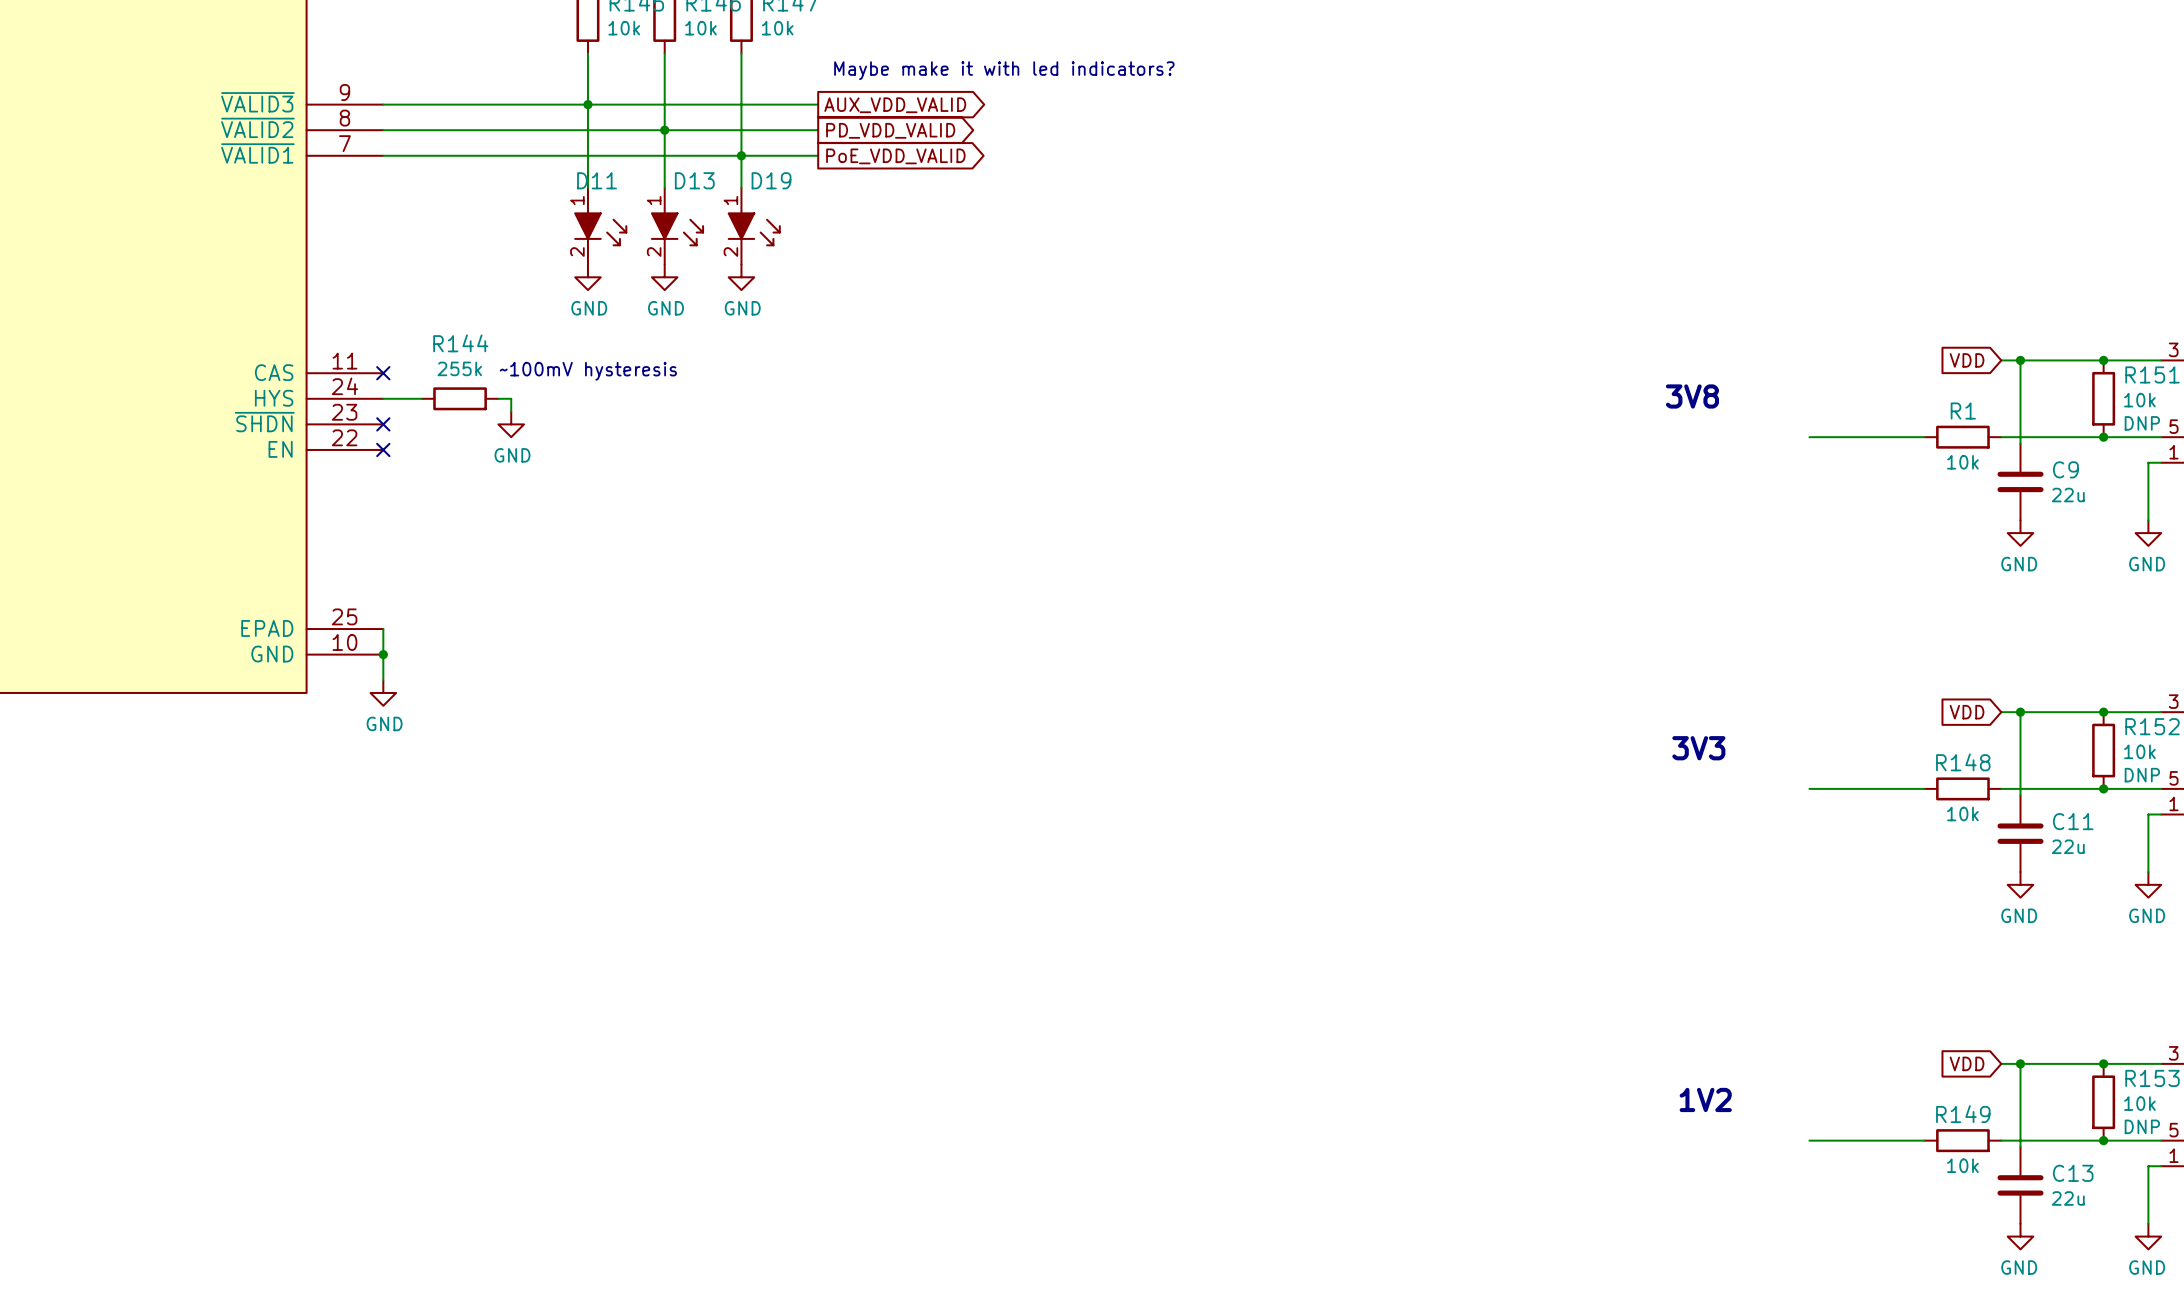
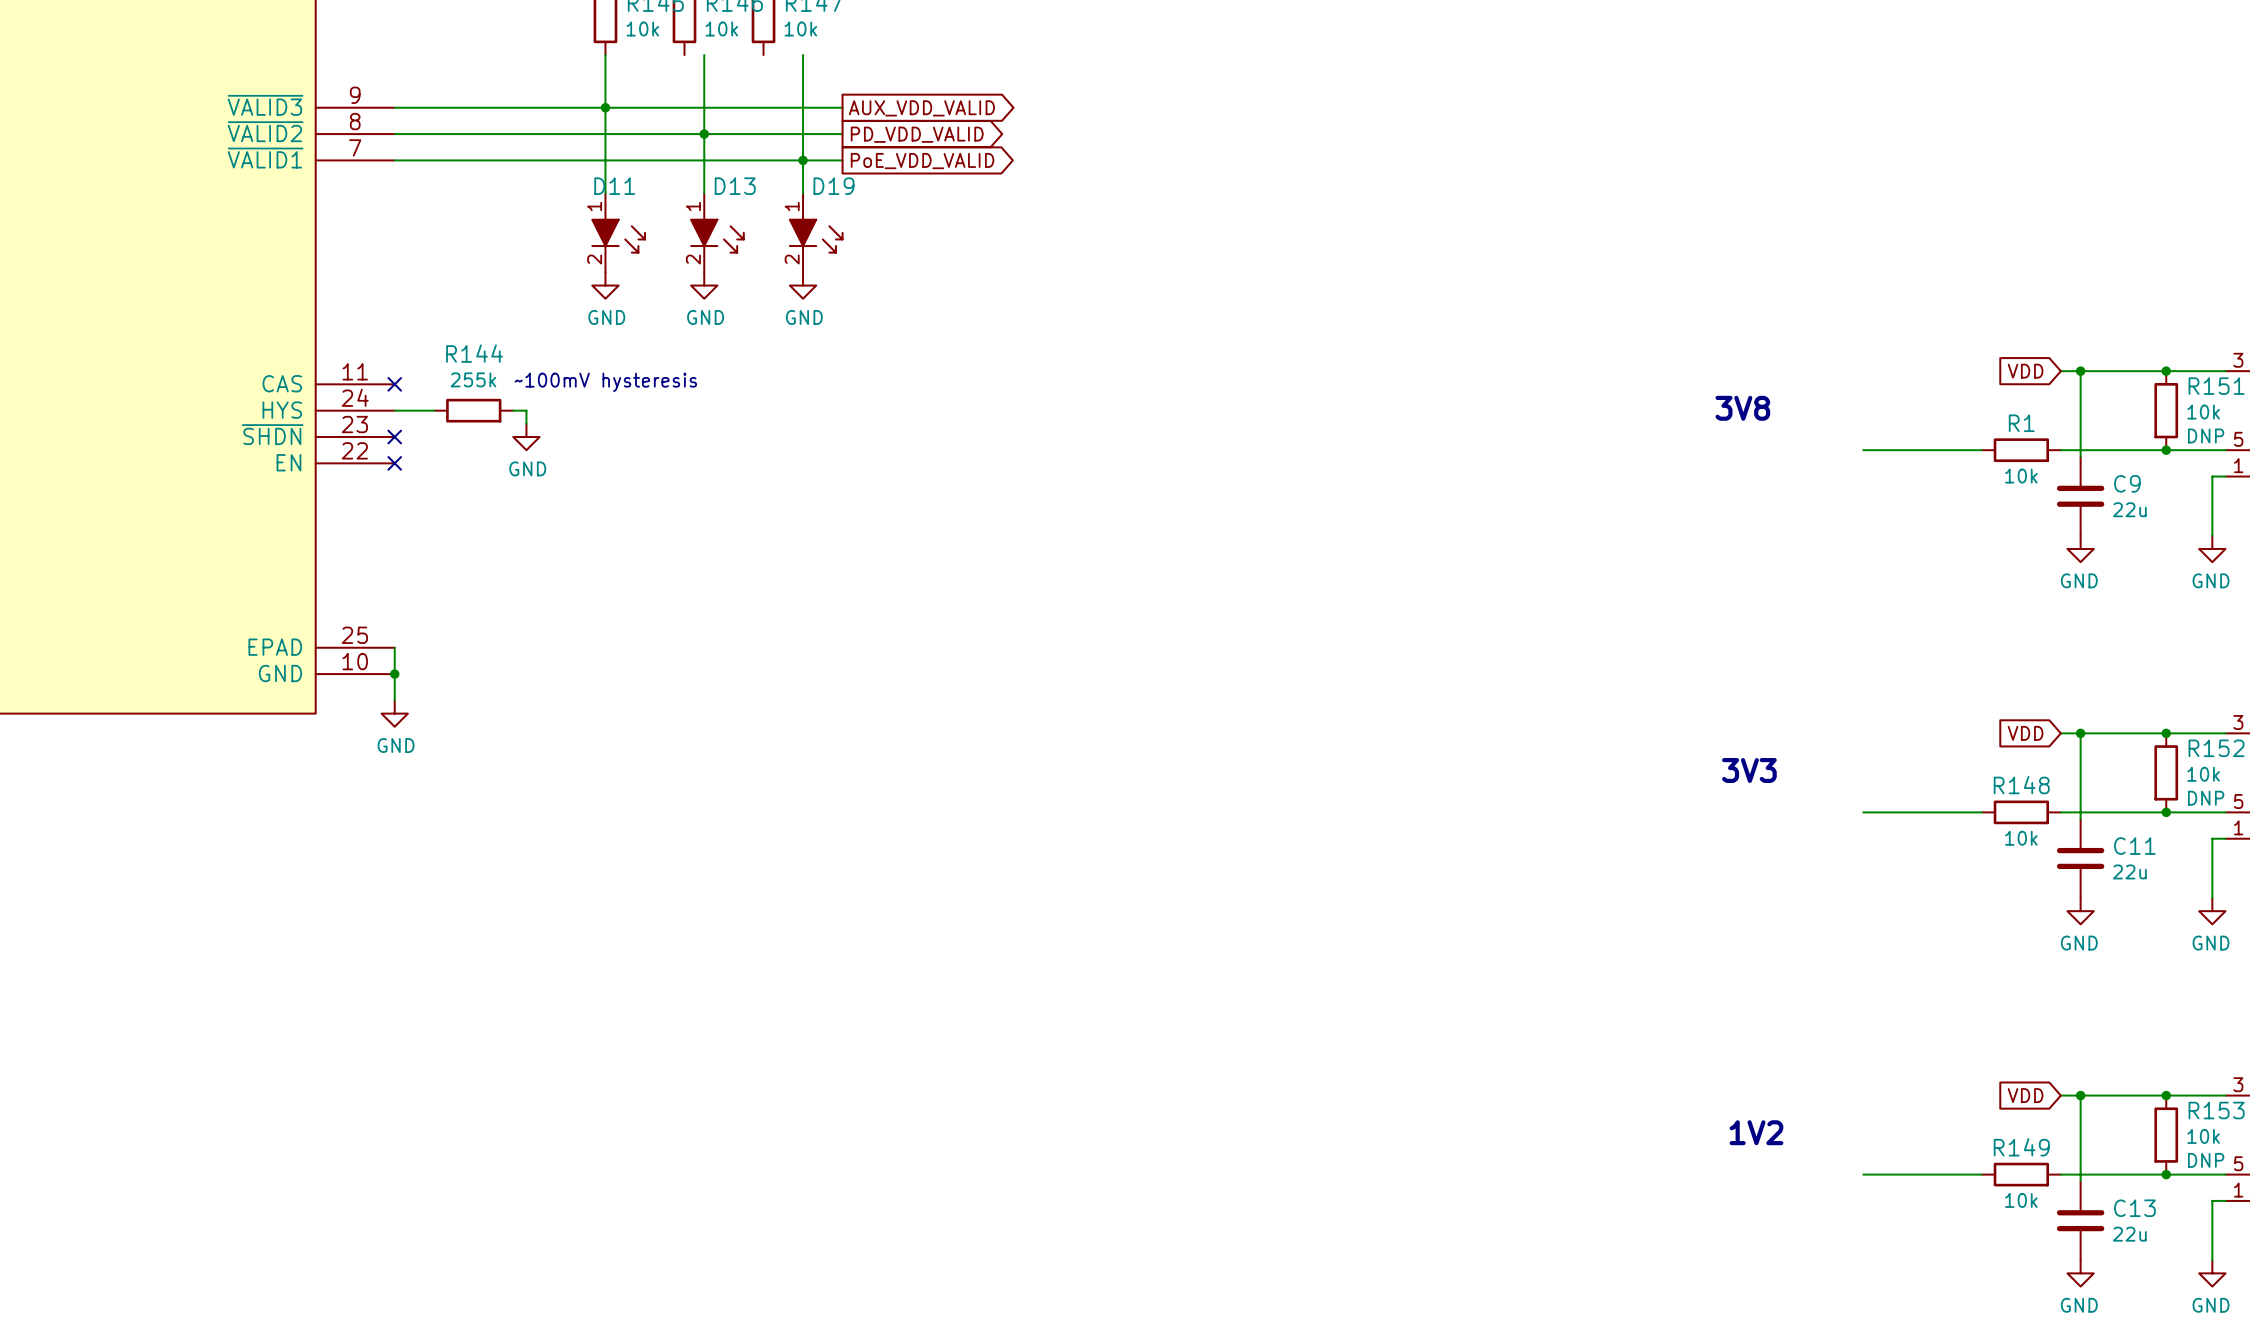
wire: (664, 53) (664, 187) -> (704, 55) (704, 193)
wire: (741, 53) (741, 187) -> (803, 55) (803, 193)
text: Maybe make it with led indicators? (1004, 70) -> none
junction position: (664, 130) -> (704, 134)
junction: (741, 155) -> none
junction: none -> (803, 160)
D13 position: (677, 226) -> (717, 232)
D19 position: (754, 226) -> (816, 232)
power symbol position: GND (664, 277) -> GND (704, 285)
power symbol: GND (741, 277) -> none
power symbol: none -> GND (803, 285)

